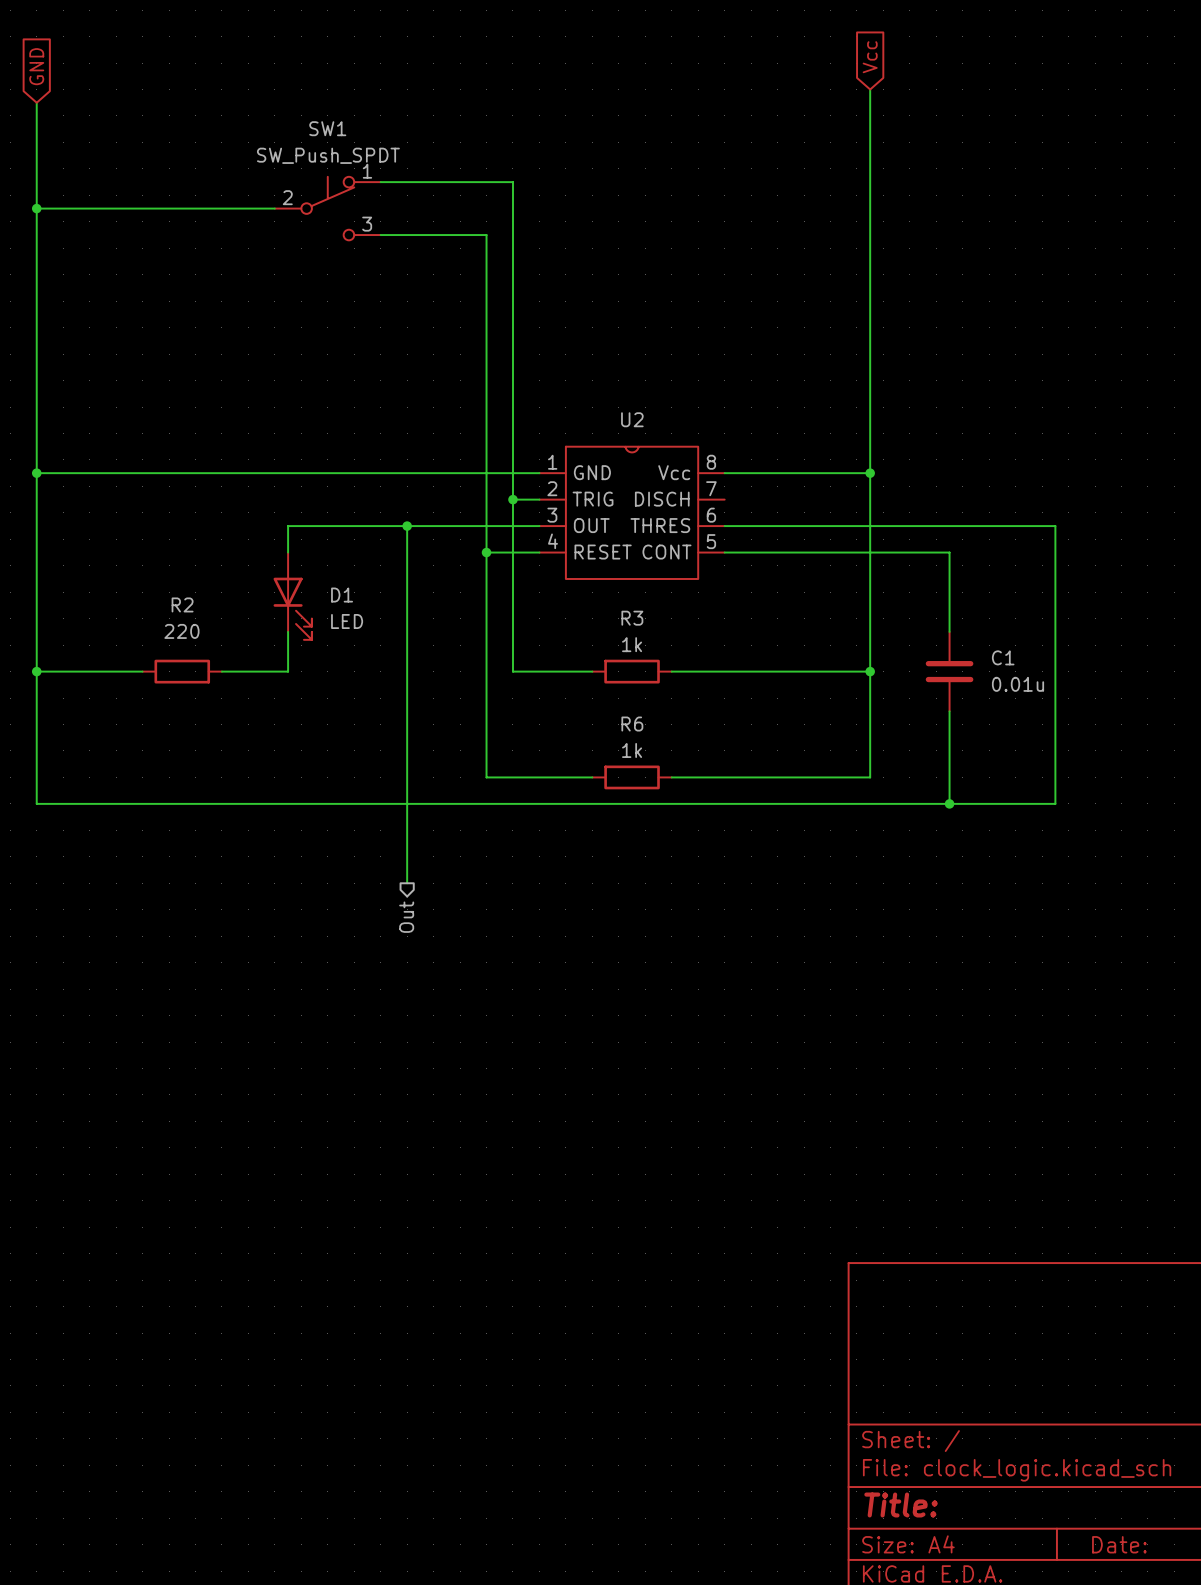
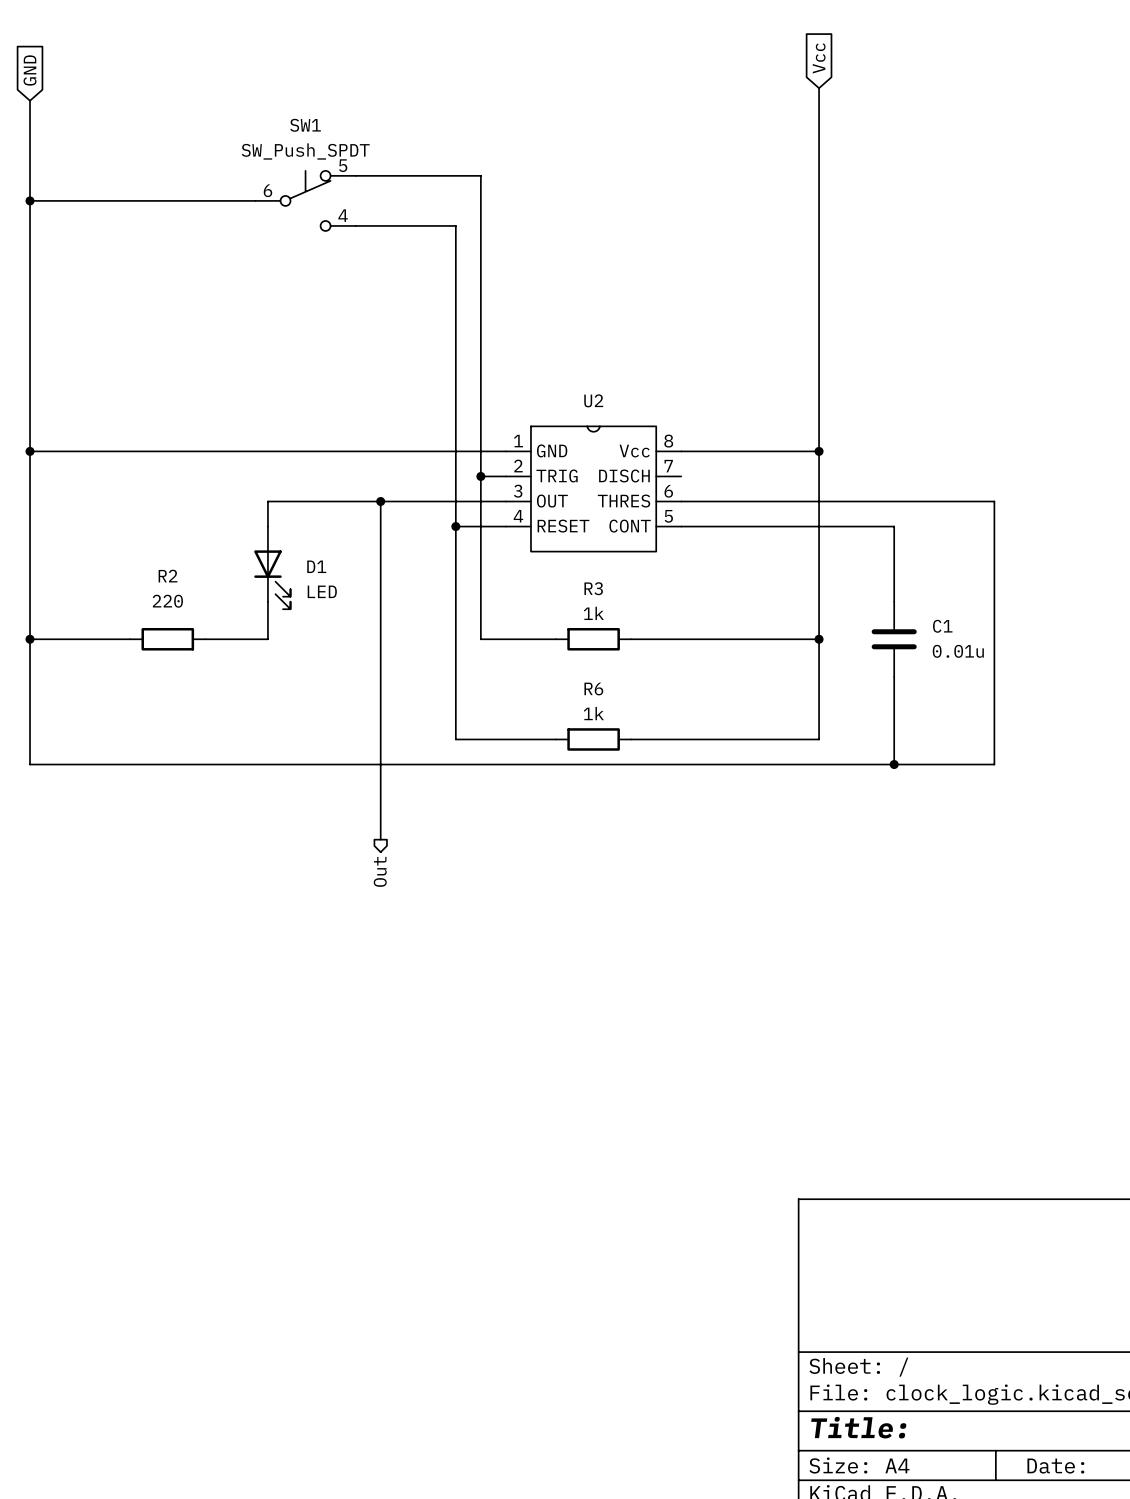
SW1 pin number: 1 (367, 171) -> 5 (343, 165)
SW1 pin number: 2 (287, 197) -> 6 (267, 190)
SW1 pin number: 3 (367, 224) -> 4 (343, 215)

